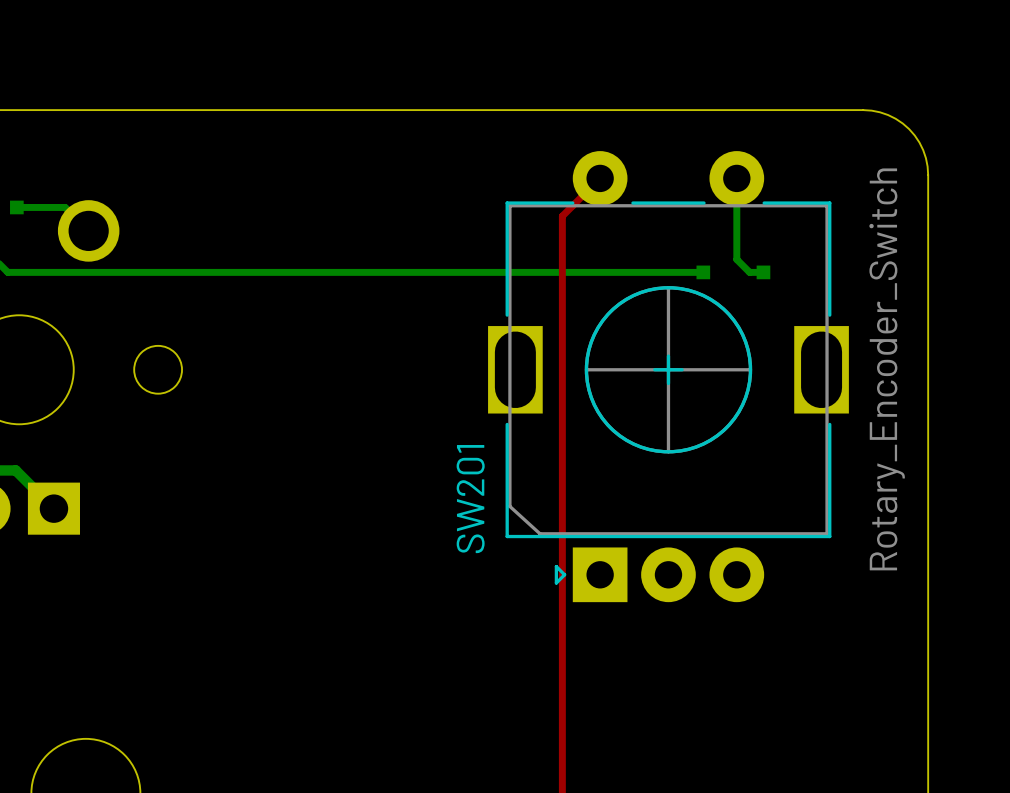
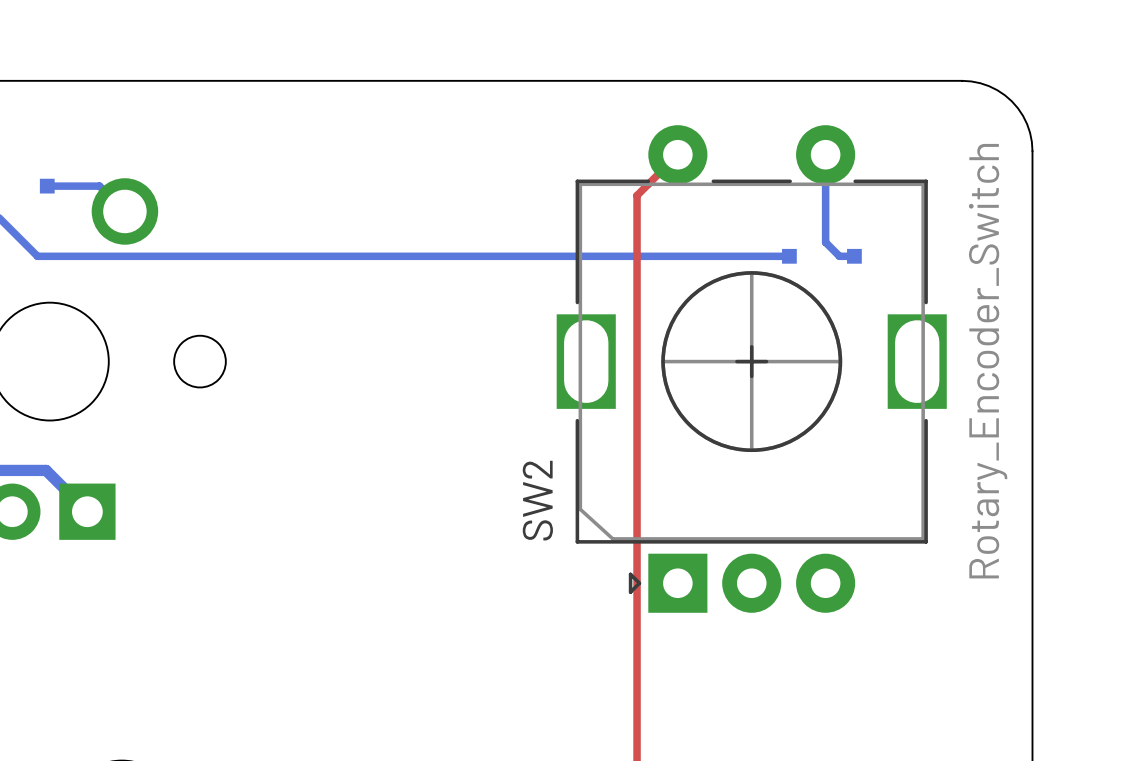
SW201 name: SW201 (470, 499) -> SW2 (537, 500)

